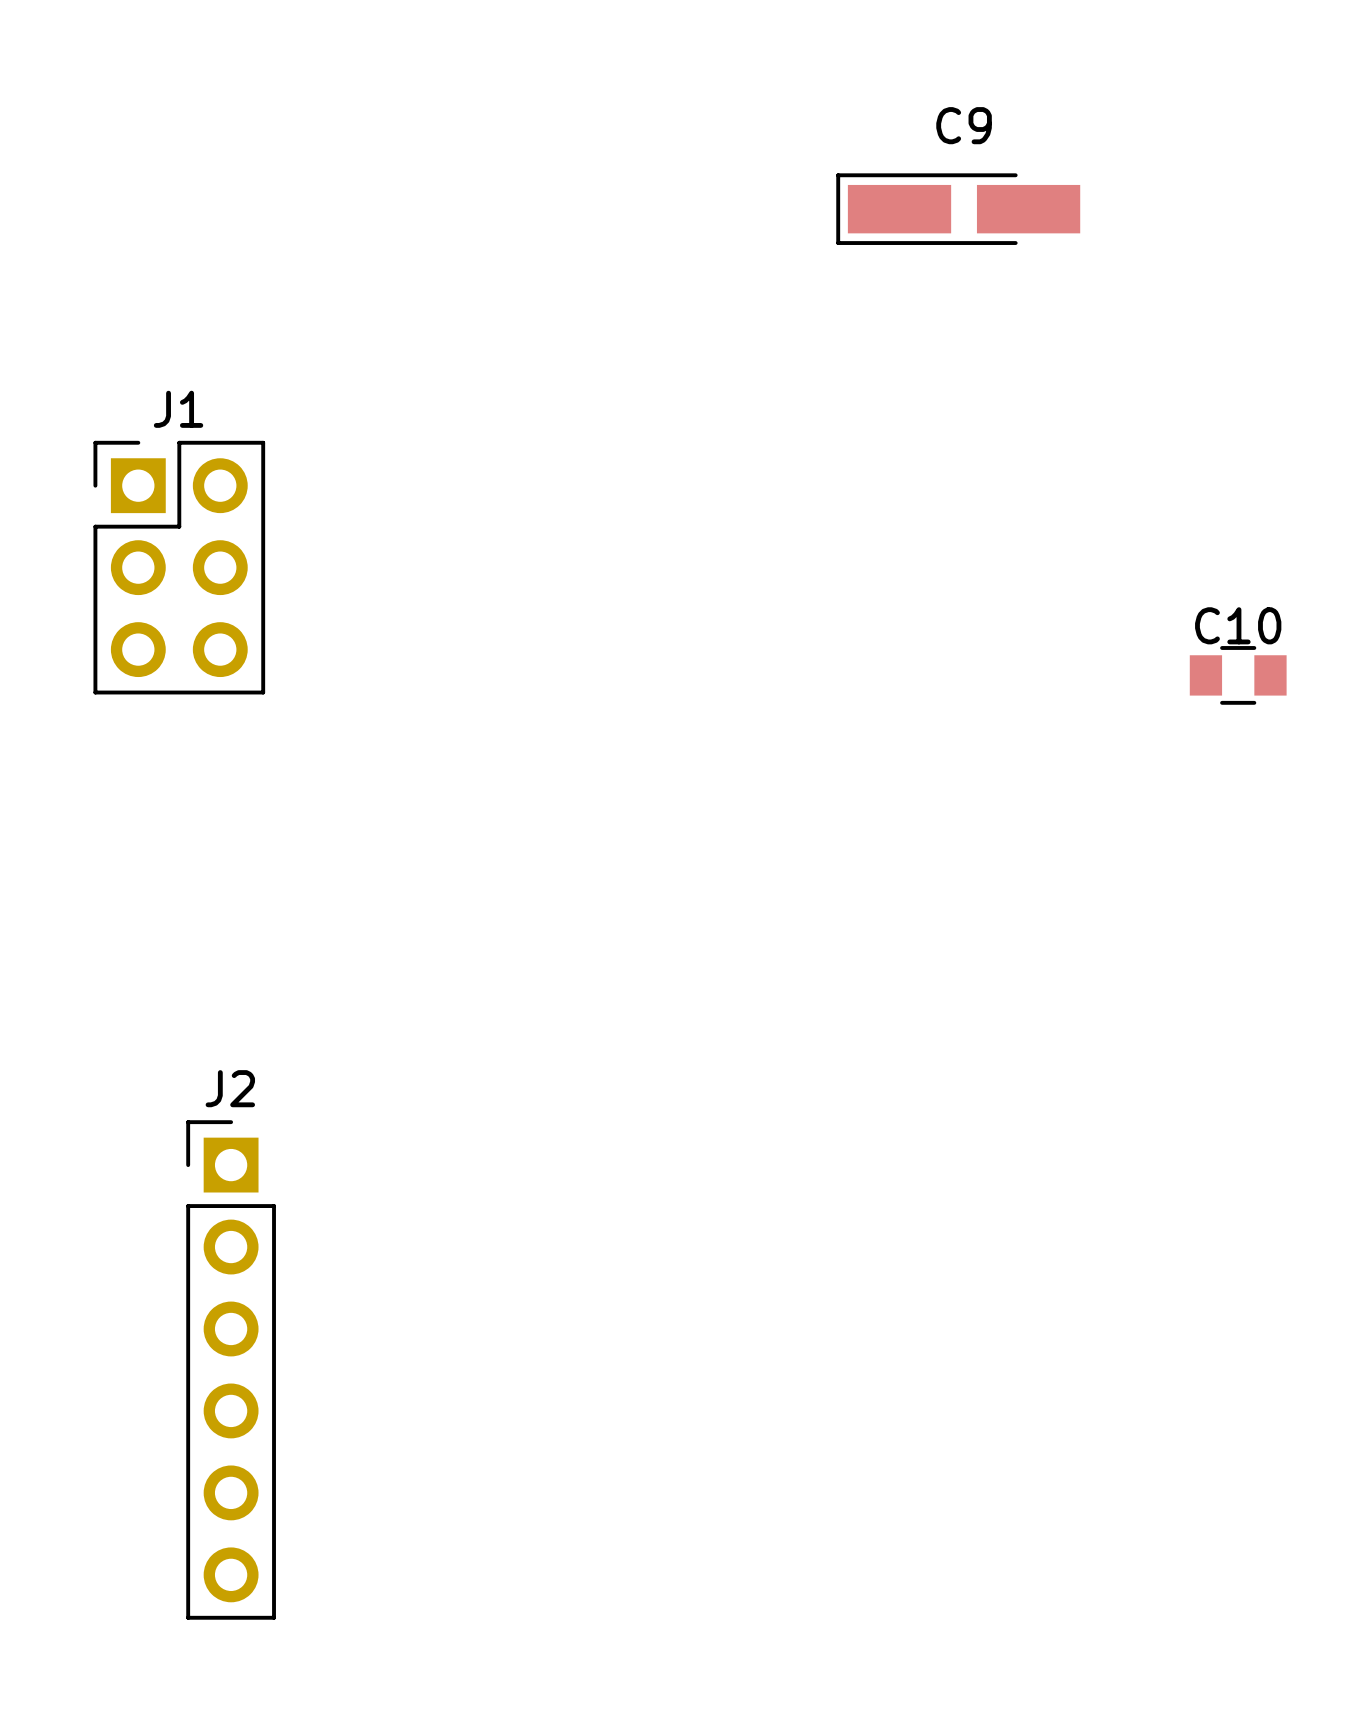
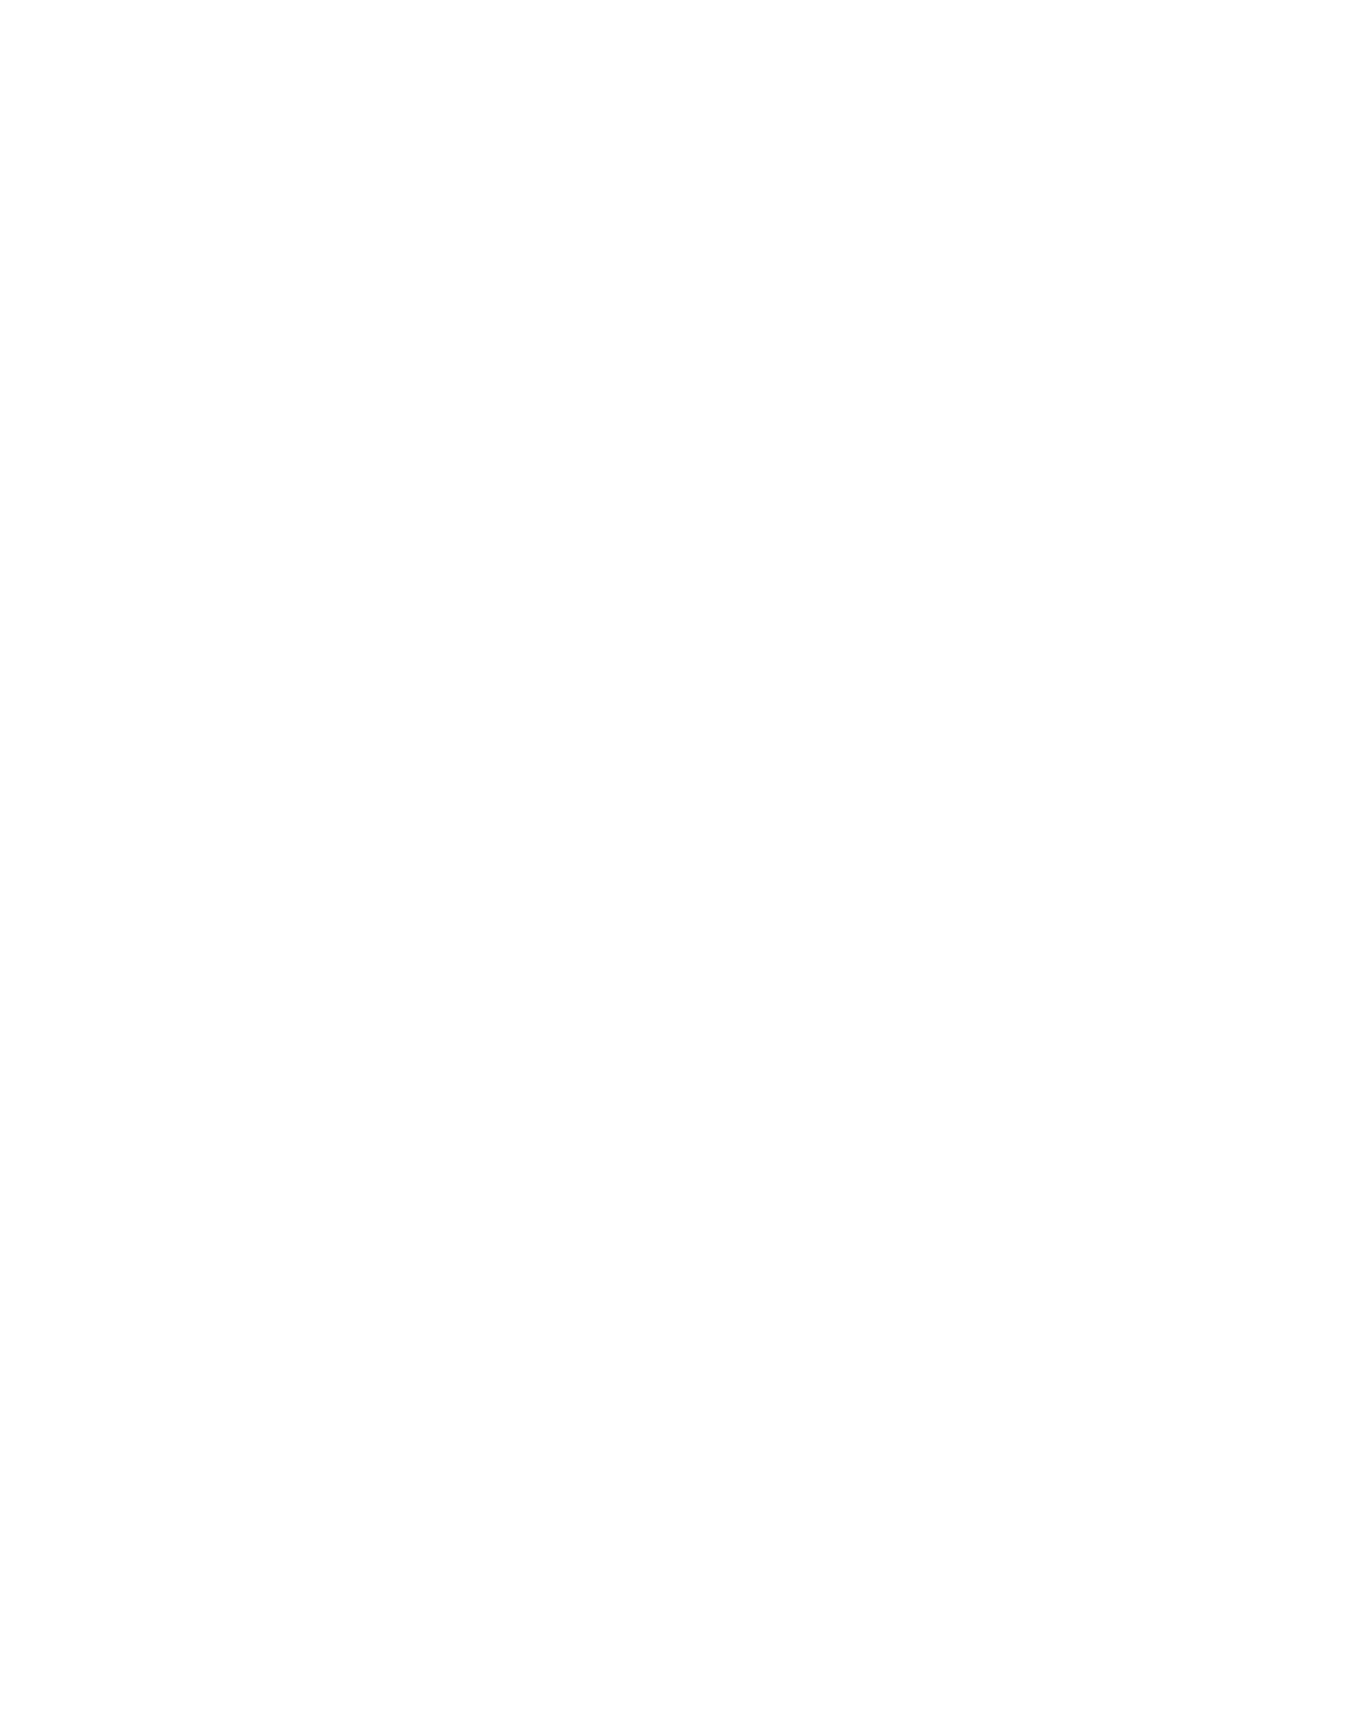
C9: (958, 209) -> none
J1: (179, 567) -> none
C10: (1238, 675) -> none
J2: (231, 1369) -> none

